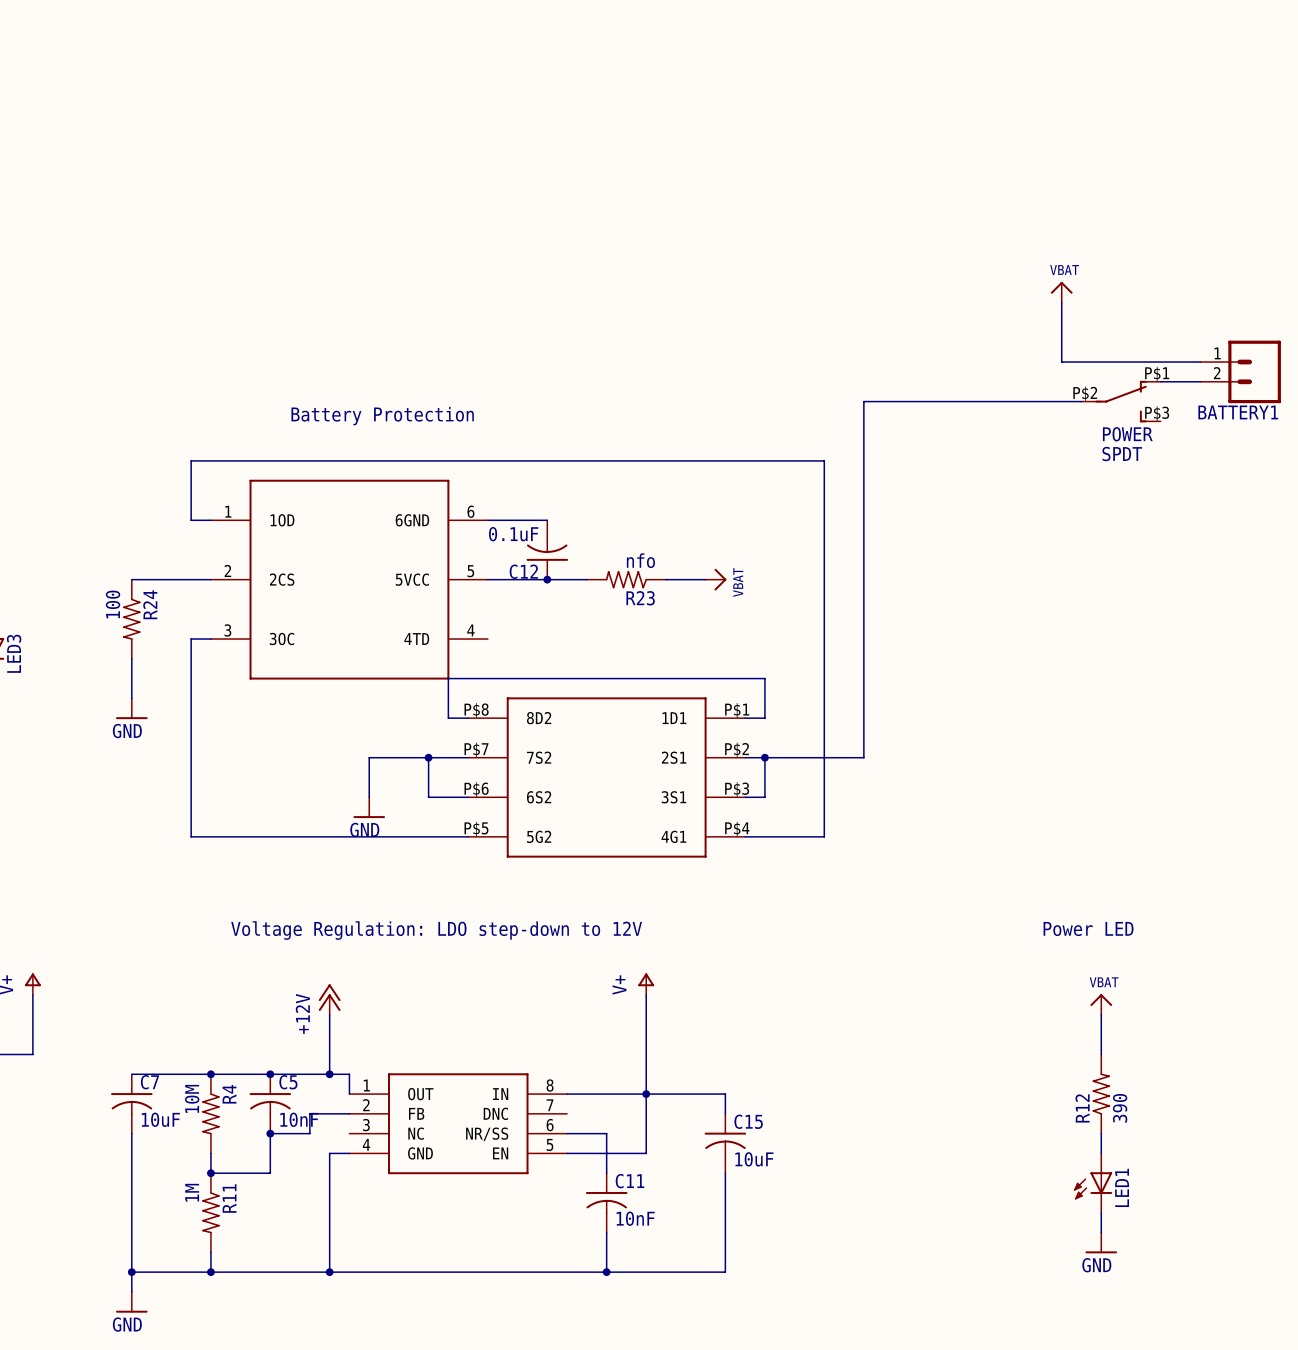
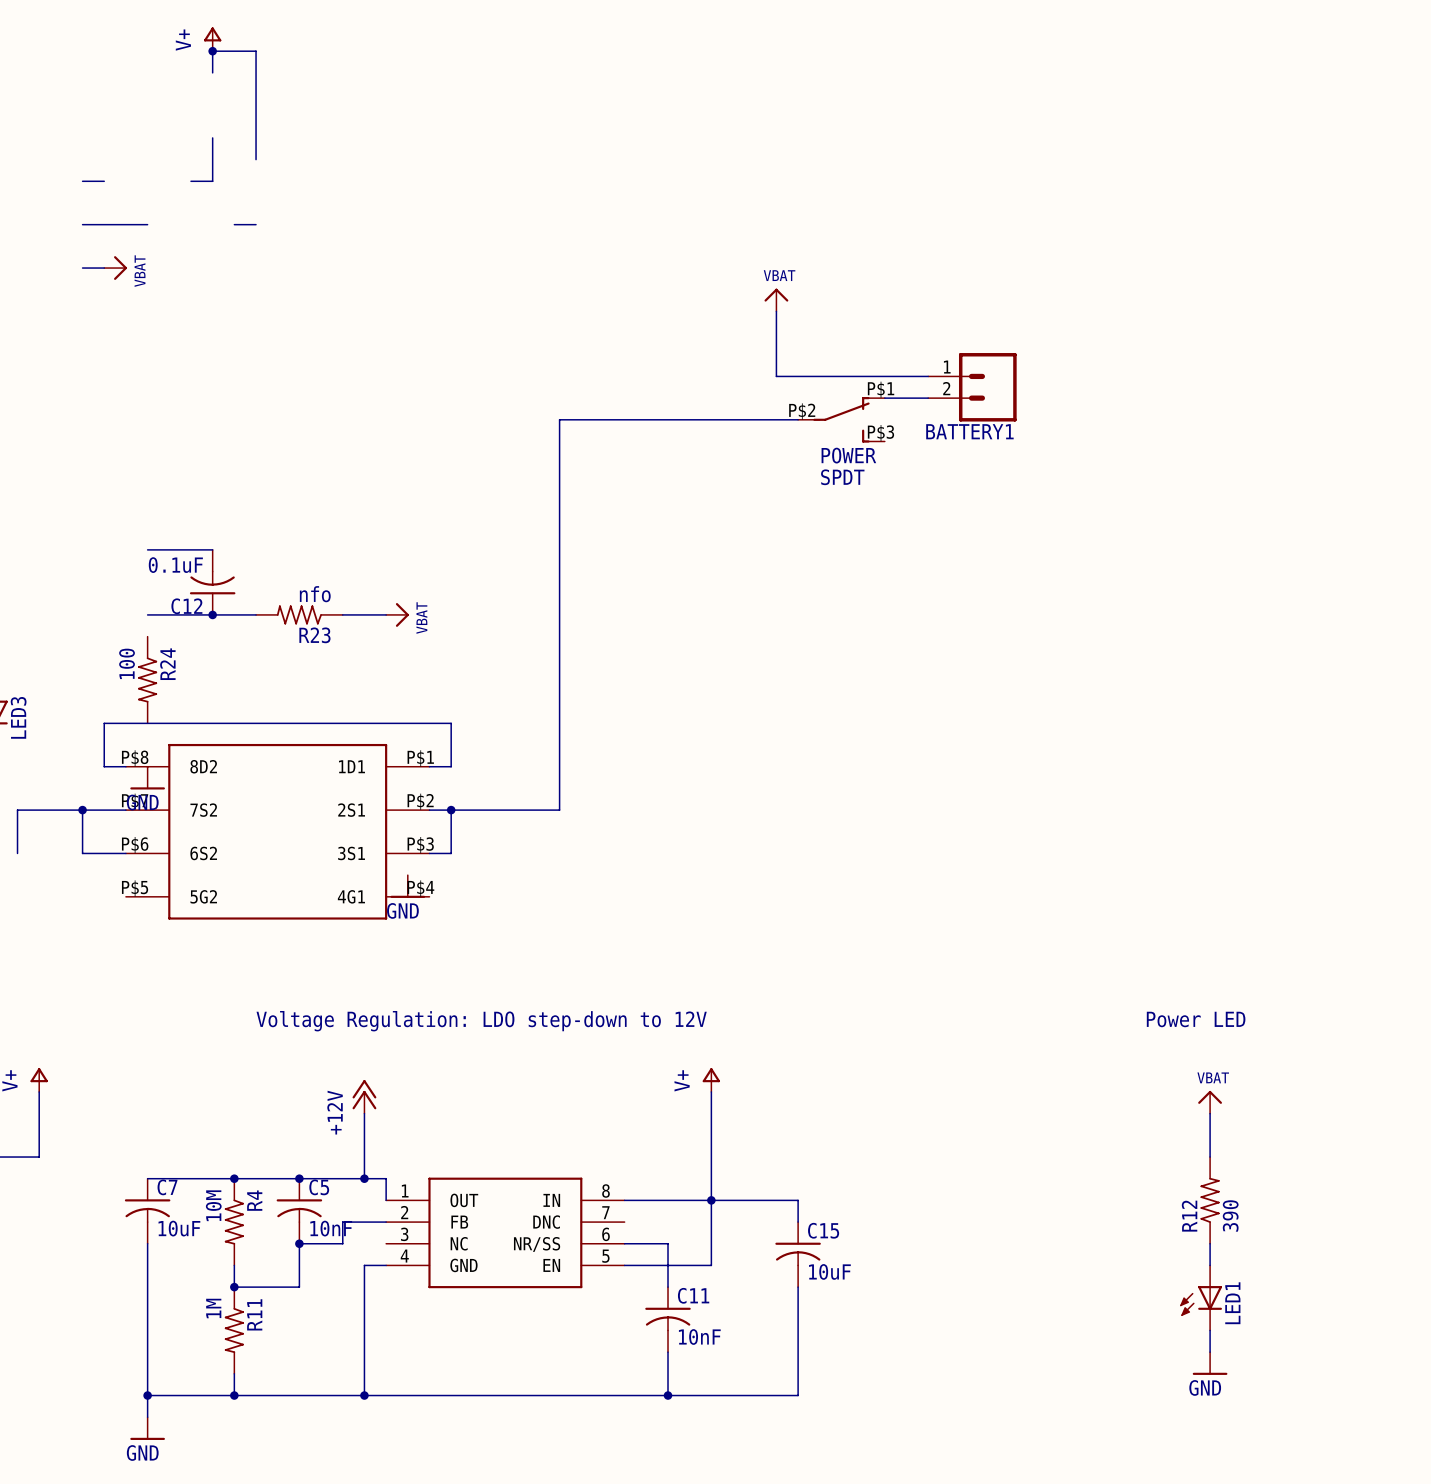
power symbol: none -> V+ (212, 39)
junction: none -> (212, 51)
wire: none -> (212, 72) (212, 51) (256, 51) (256, 159)
wire: none -> (212, 137) (212, 181) (190, 181)
wire: none -> (82, 181) (104, 181)
wire: none -> (82, 224) (147, 224)
wire: none -> (234, 224) (256, 224)
wire: none -> (82, 268) (104, 268)
power symbol: none -> VBAT (115, 268)
power symbol: none -> VBAT (776, 300)
wire: none -> (776, 311) (776, 376) (928, 376)
power symbol: VBAT (1061, 292) -> none
wire: (1061, 302) (1061, 362) (1200, 362) -> none
wire: none -> (884, 398) (928, 398)
BATTERY1 position: (1240, 371) -> (972, 387)
wire: none -> (798, 419) (559, 419) (559, 810) (429, 810)
POWER: none -> SPDT (841, 419)
wire: (1160, 381) (1200, 381) -> none
wire: (1081, 401) (863, 401) (863, 757) (745, 757) -> none
POWER: SPDT (1121, 401) -> none
text: Battery Protection (382, 416) -> none
wire: none -> (147, 549) (212, 549)
wire: (210, 520) (191, 520) (191, 460) (824, 460) (824, 836) (745, 836) -> none
wire: (487, 520) (547, 520) -> none
C12 position: (547, 549) -> (212, 582)
wire: none -> (147, 614) (256, 614)
junction: none -> (212, 614)
wire: none -> (342, 614) (386, 614)
power symbol: none -> VBAT (397, 614)
wire: (131, 579) (210, 579) -> none
part: (349, 579) -> none
wire: (487, 579) (586, 579) -> none
junction: (547, 579) -> none
R23 position: (626, 579) -> (299, 614)
wire: (666, 579) (705, 579) -> none
power symbol: VBAT (715, 579) -> none
wire: (210, 639) (191, 639) (191, 836) (468, 836) -> none
wire: (131, 658) (131, 698) -> none
wire: none -> (125, 766) (104, 766) (104, 723) (451, 723) (451, 766) (429, 766)
wire: (468, 718) (448, 718) (448, 678) (764, 678) (764, 718) (745, 718) -> none
wire: none -> (82, 810) (82, 853) (125, 853)
junction: none -> (82, 810)
wire: none -> (125, 810) (17, 810) (17, 853)
wire: none -> (451, 810) (451, 853) (429, 853)
part: none -> (277, 831)
wire: (428, 757) (428, 797) (468, 797) -> none
junction position: (428, 757) -> (451, 810)
wire: (468, 757) (369, 757) (369, 797) -> none
wire: (764, 757) (764, 797) (745, 797) -> none
junction: (764, 757) -> none
part: (606, 777) -> none

